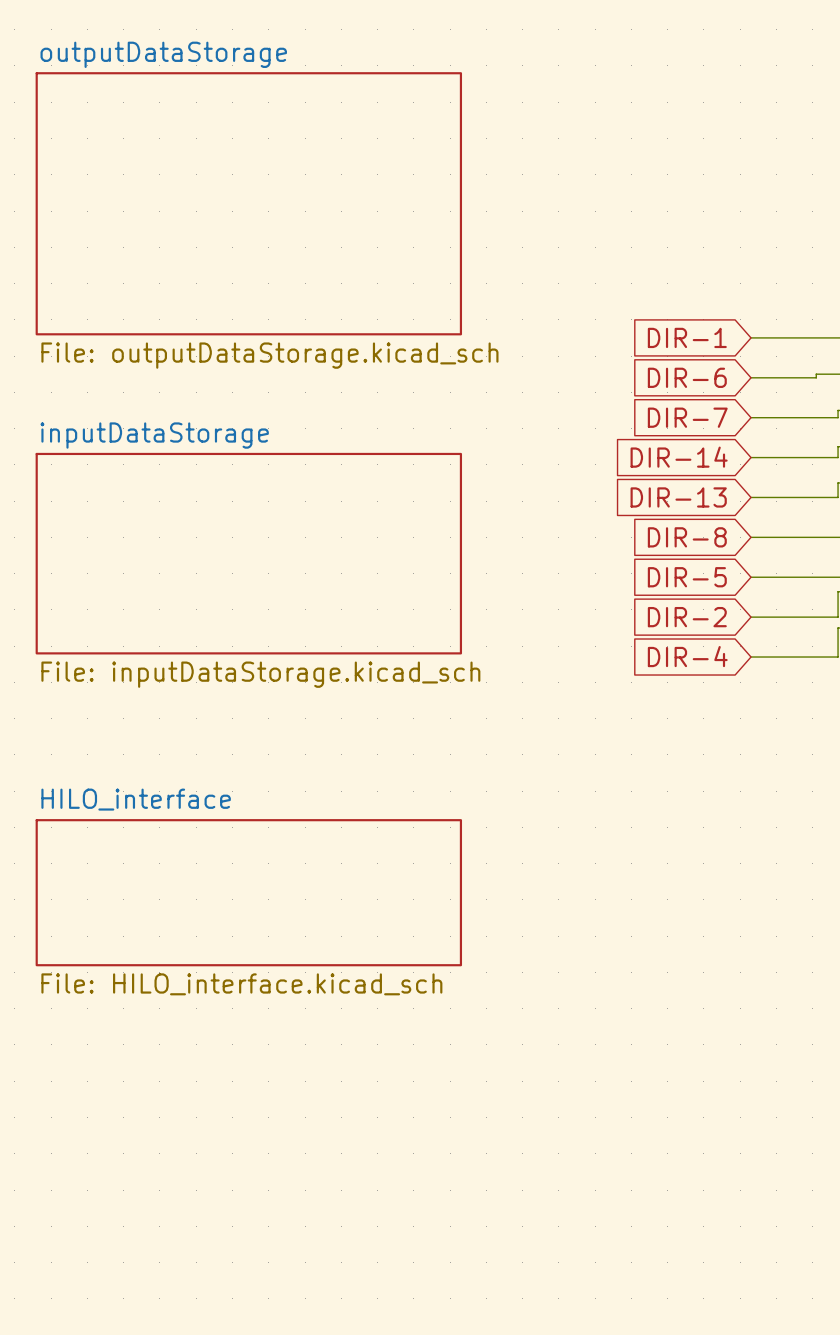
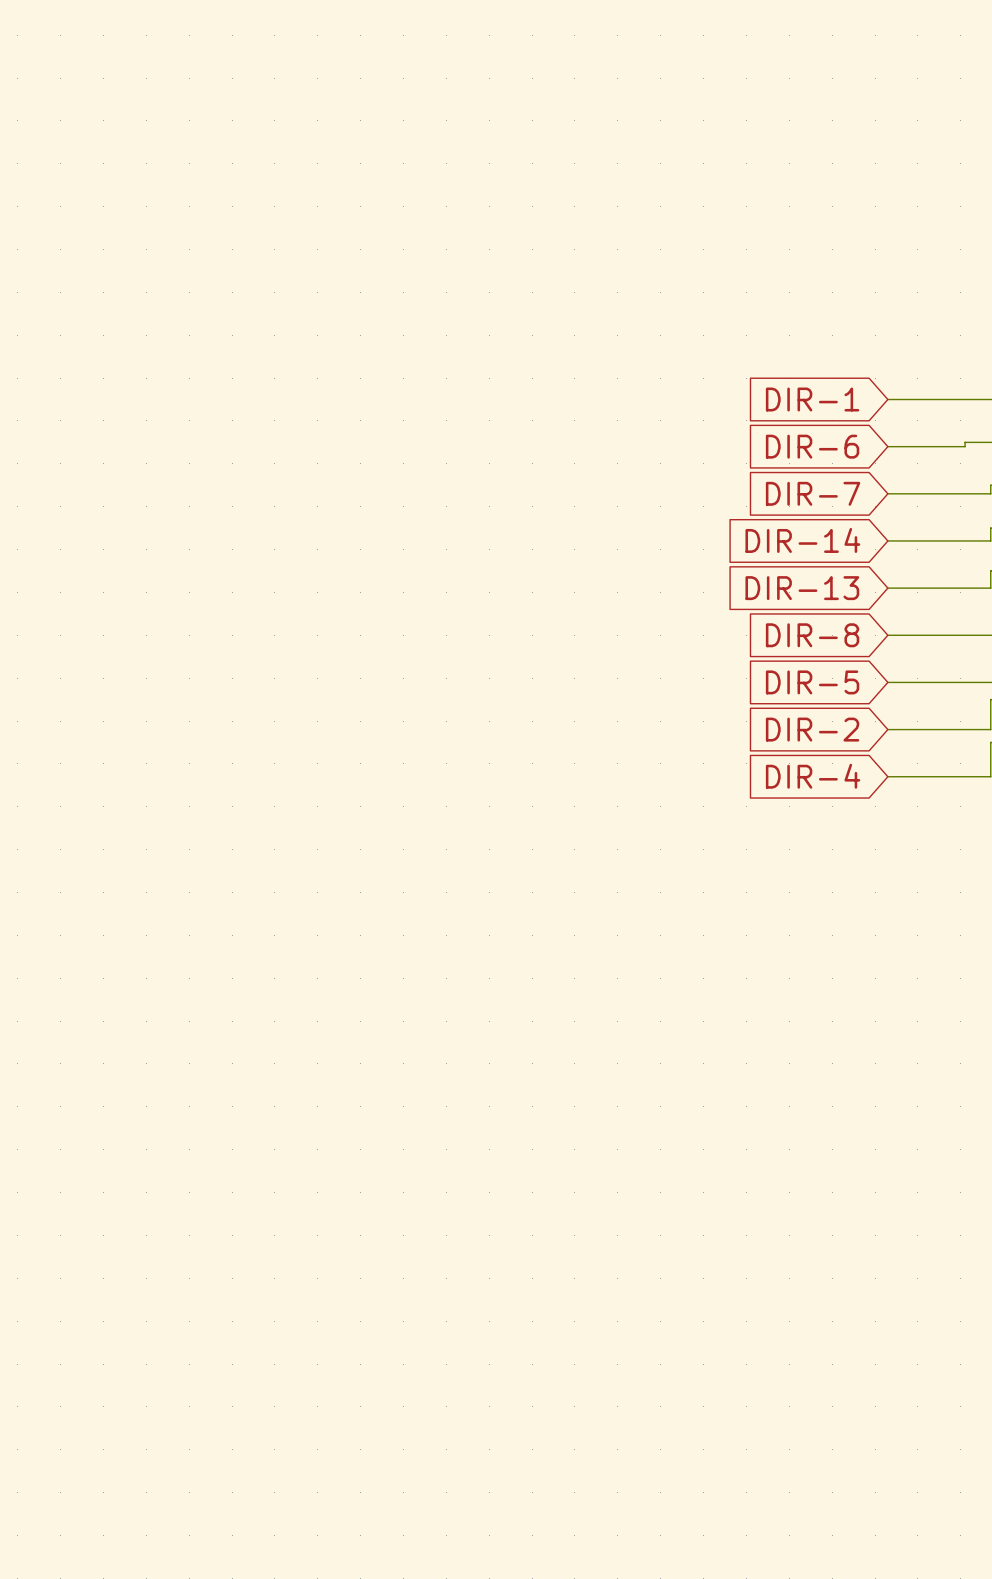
sheet outputDataStorage: File: outputDataStorage.kicad_sch (248, 203) -> none
sheet inputDataStorage: File: inputDataStorage.kicad_sch (248, 553) -> none
sheet HILO_interface: File: HILO_interface.kicad_sch (248, 892) -> none

